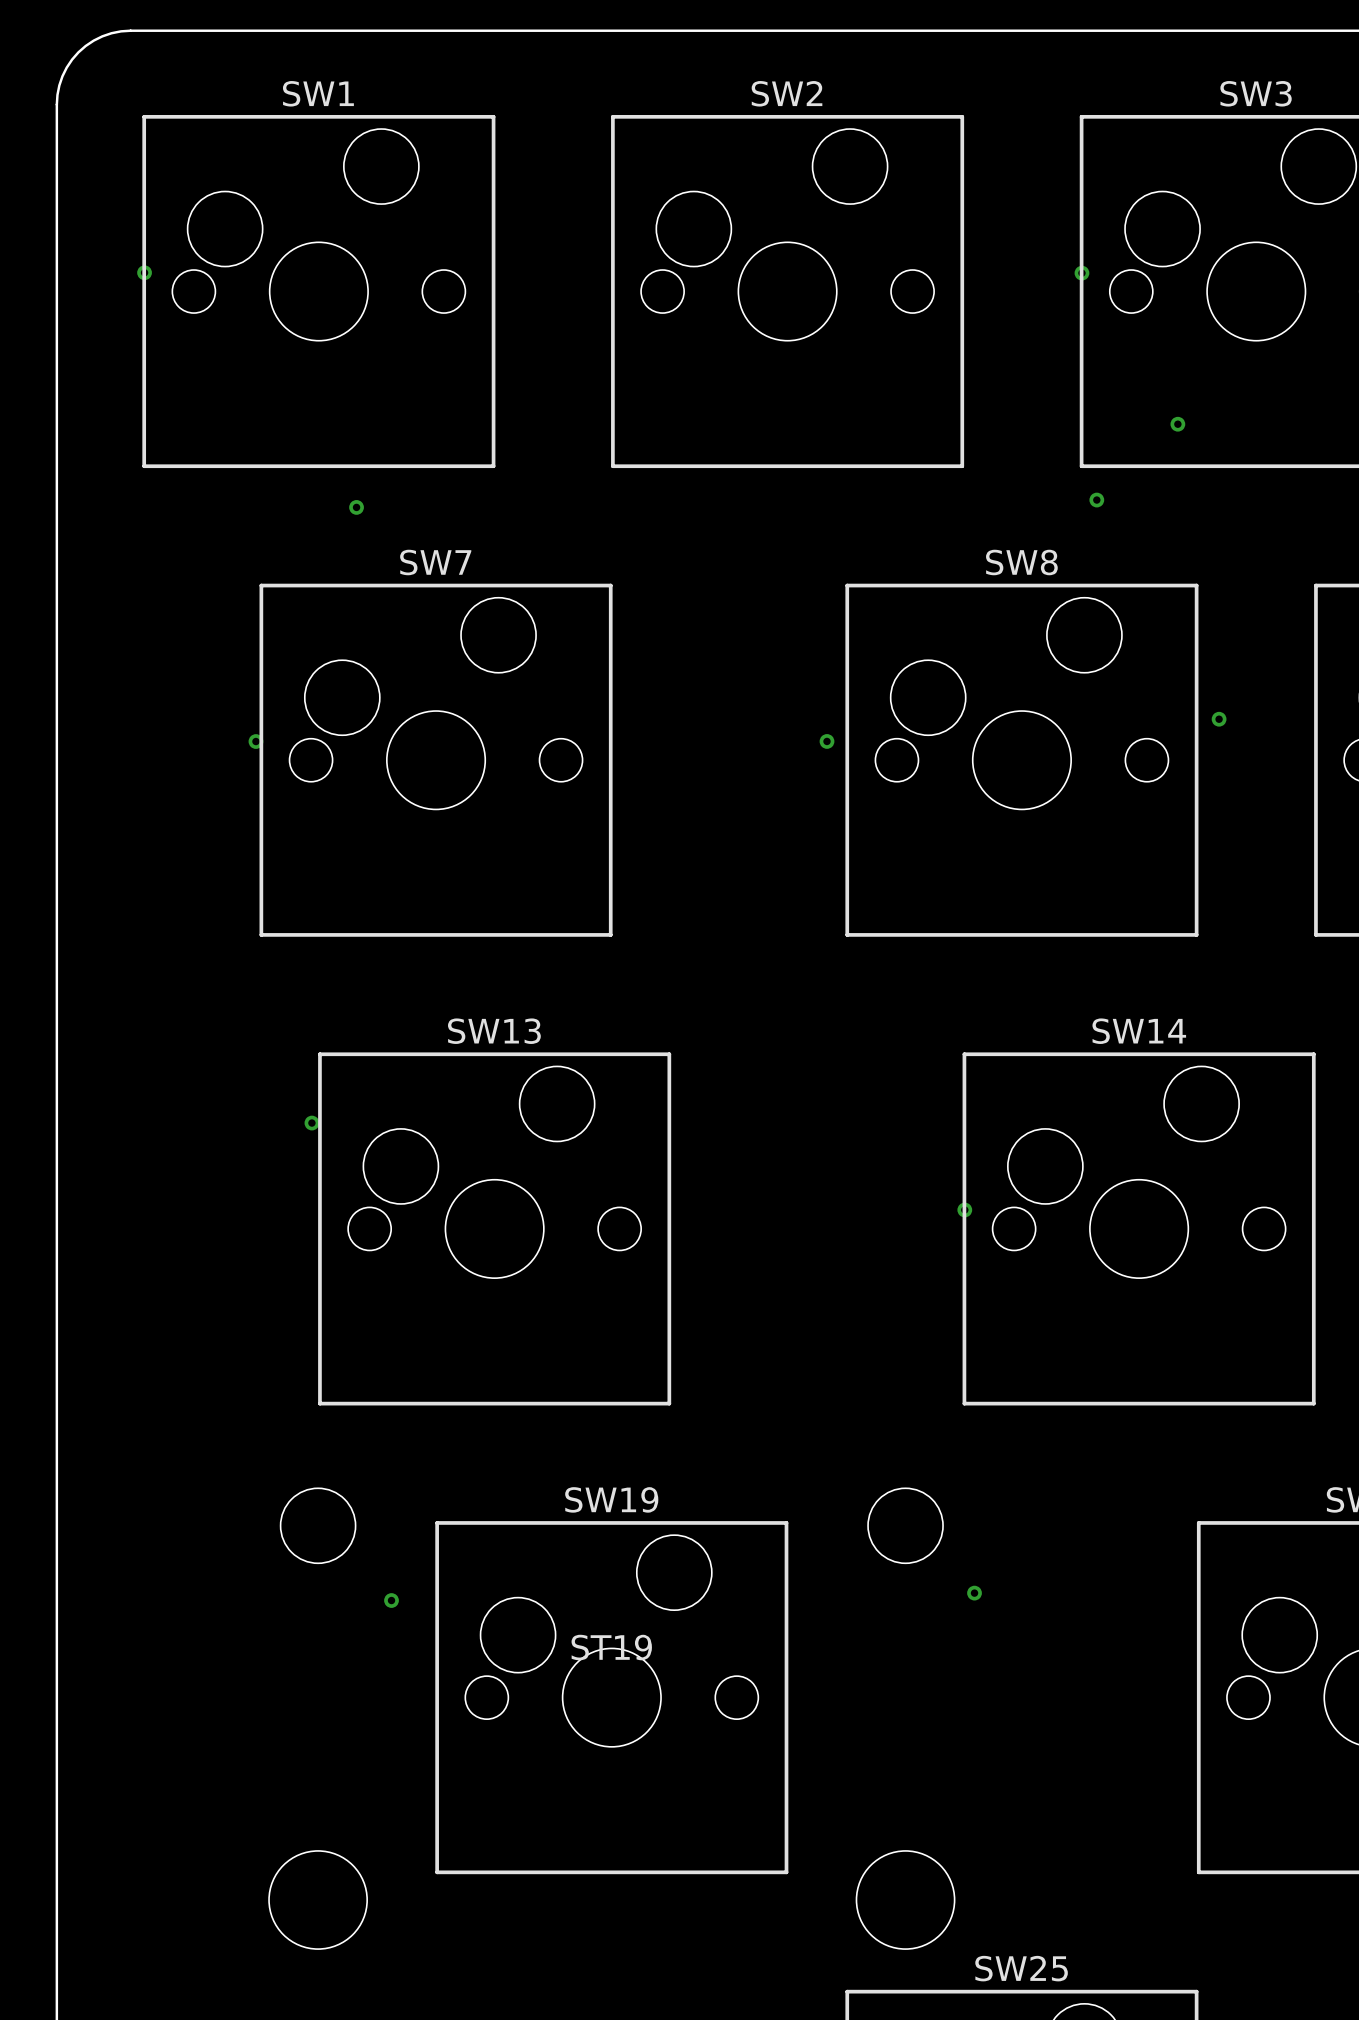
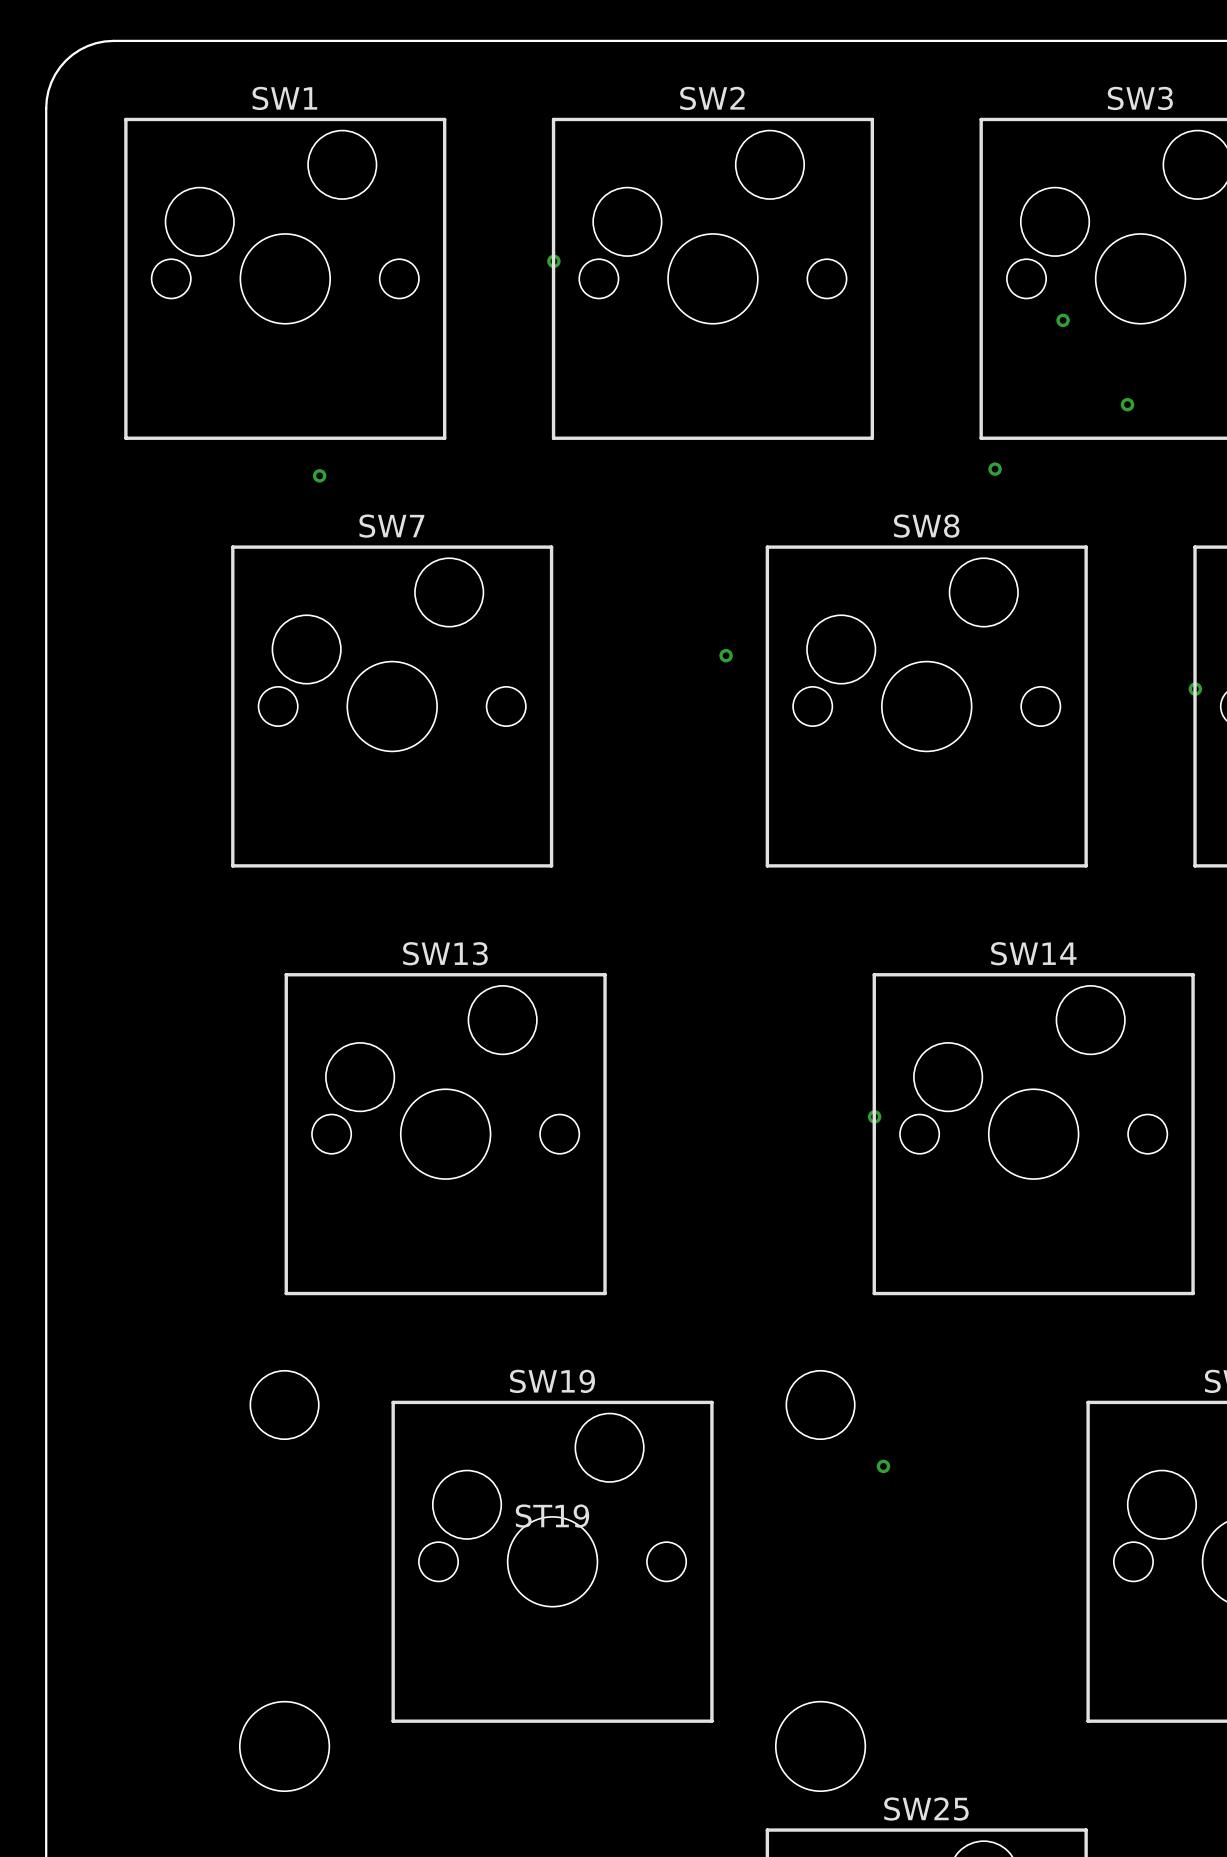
via: (144, 272) -> none
via: none -> (553, 261)
via: (1081, 273) -> none
via: none -> (1063, 320)
via: (1177, 424) -> none
via: none -> (1127, 404)
via position: (1219, 719) -> (1195, 689)
via: (255, 741) -> none
via position: (827, 741) -> (726, 655)
via: (311, 1123) -> none
via: (391, 1600) -> none

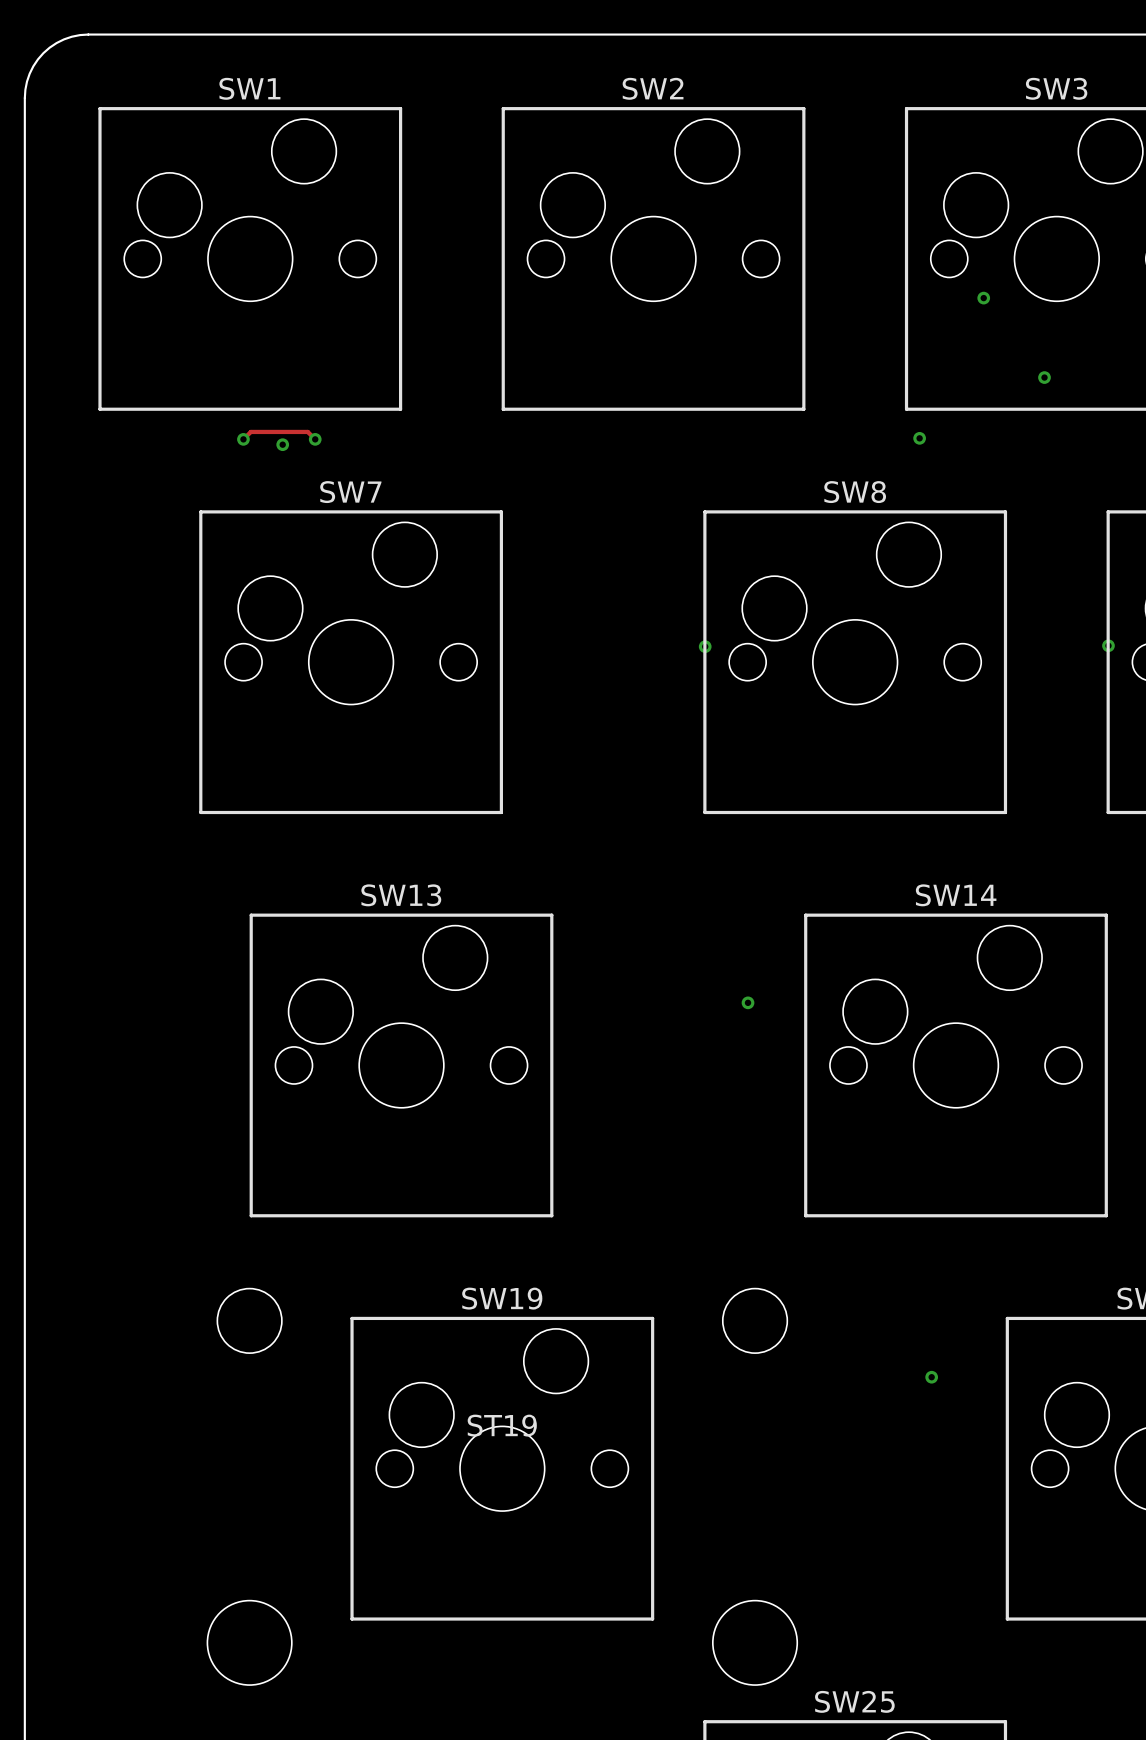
via: (553, 261) -> none
track: none -> (243, 439) (250, 431) (307, 431) (315, 439)
via: none -> (243, 439)
via: none -> (315, 439)
via position: (726, 655) -> (705, 646)
via position: (874, 1116) -> (748, 1002)
via position: (883, 1466) -> (931, 1377)

